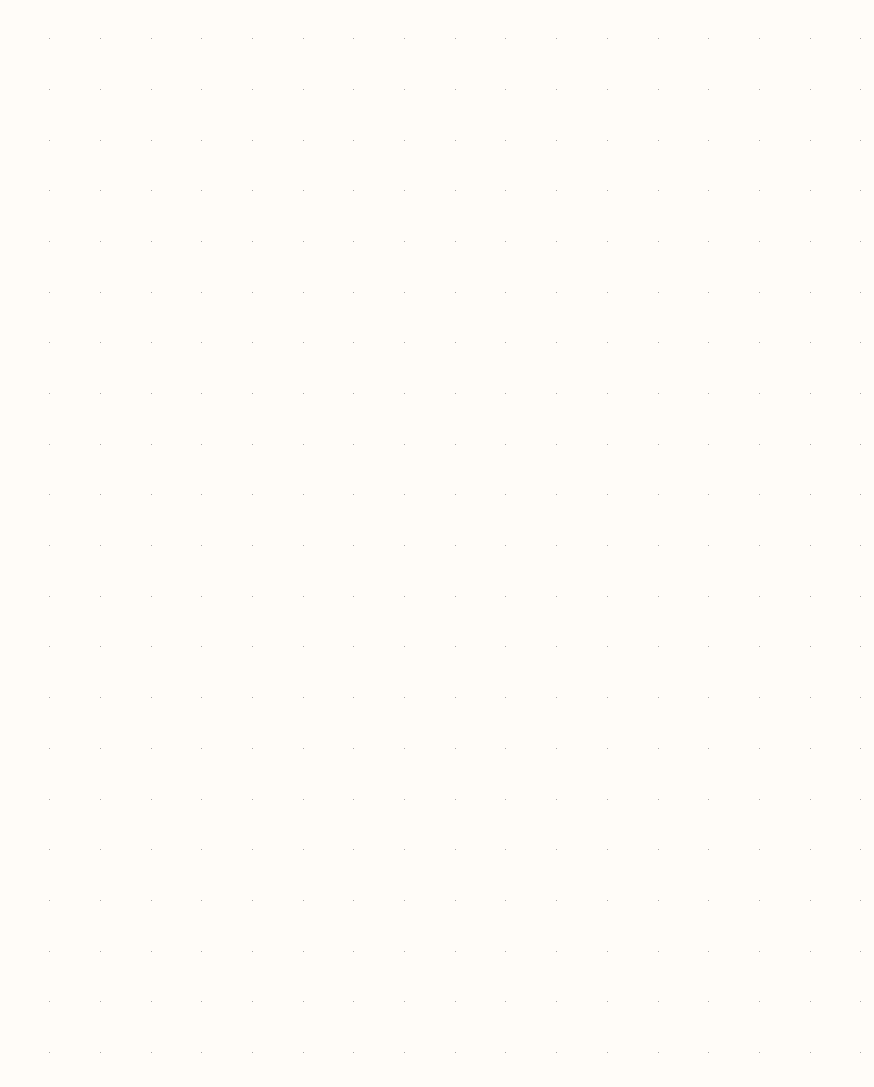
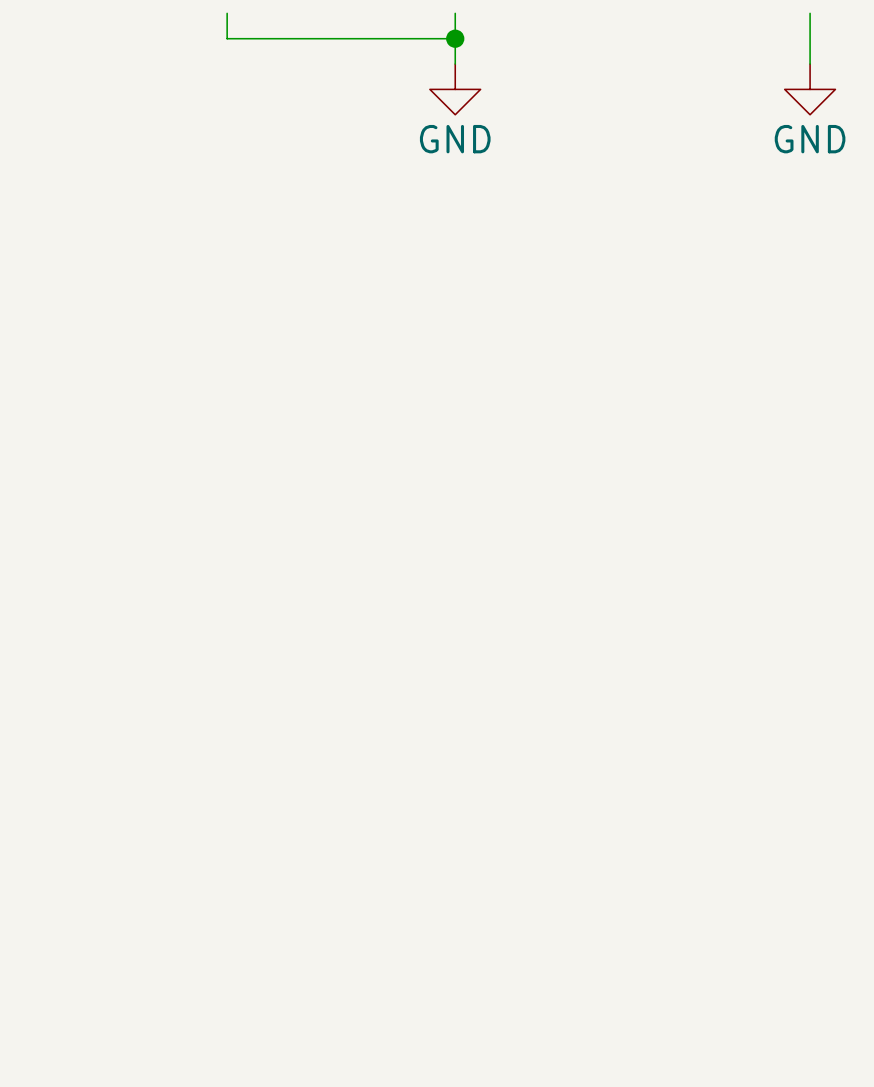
wire: none -> (227, 13) (227, 38) (455, 38)
wire: none -> (455, 13) (455, 64)
wire: none -> (810, 13) (810, 64)
junction: none -> (455, 38)
power symbol: none -> GND (455, 89)
power symbol: none -> GND (810, 89)

